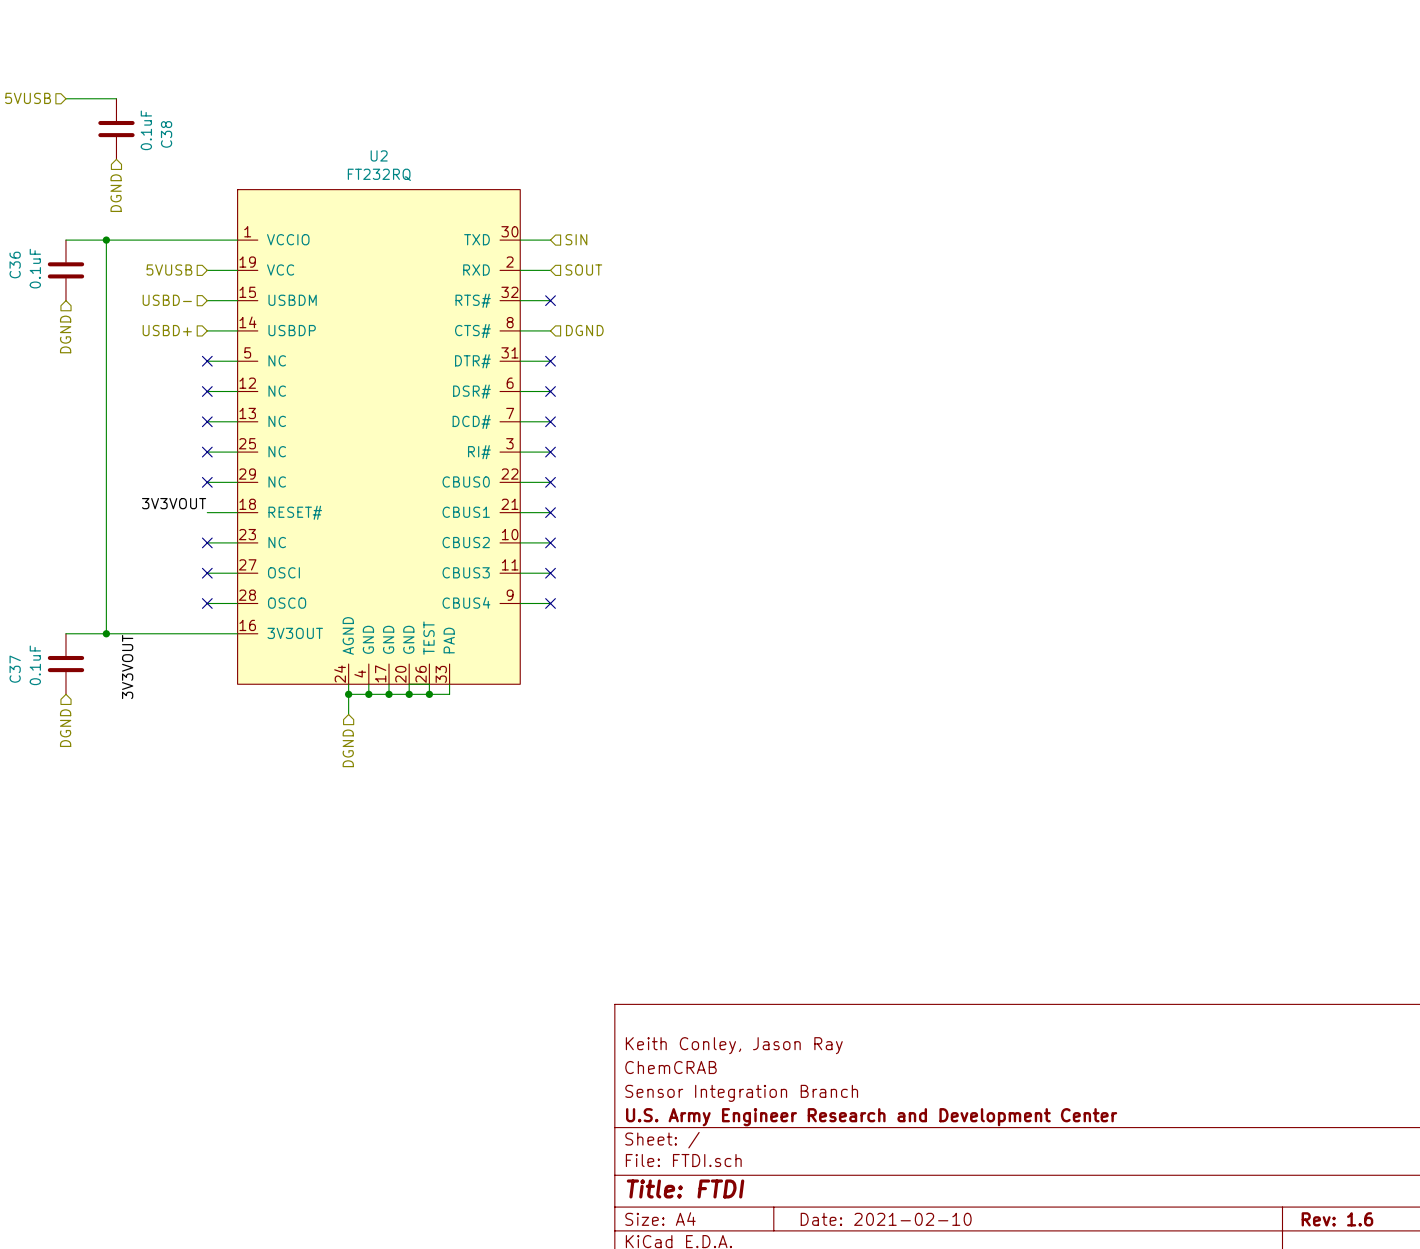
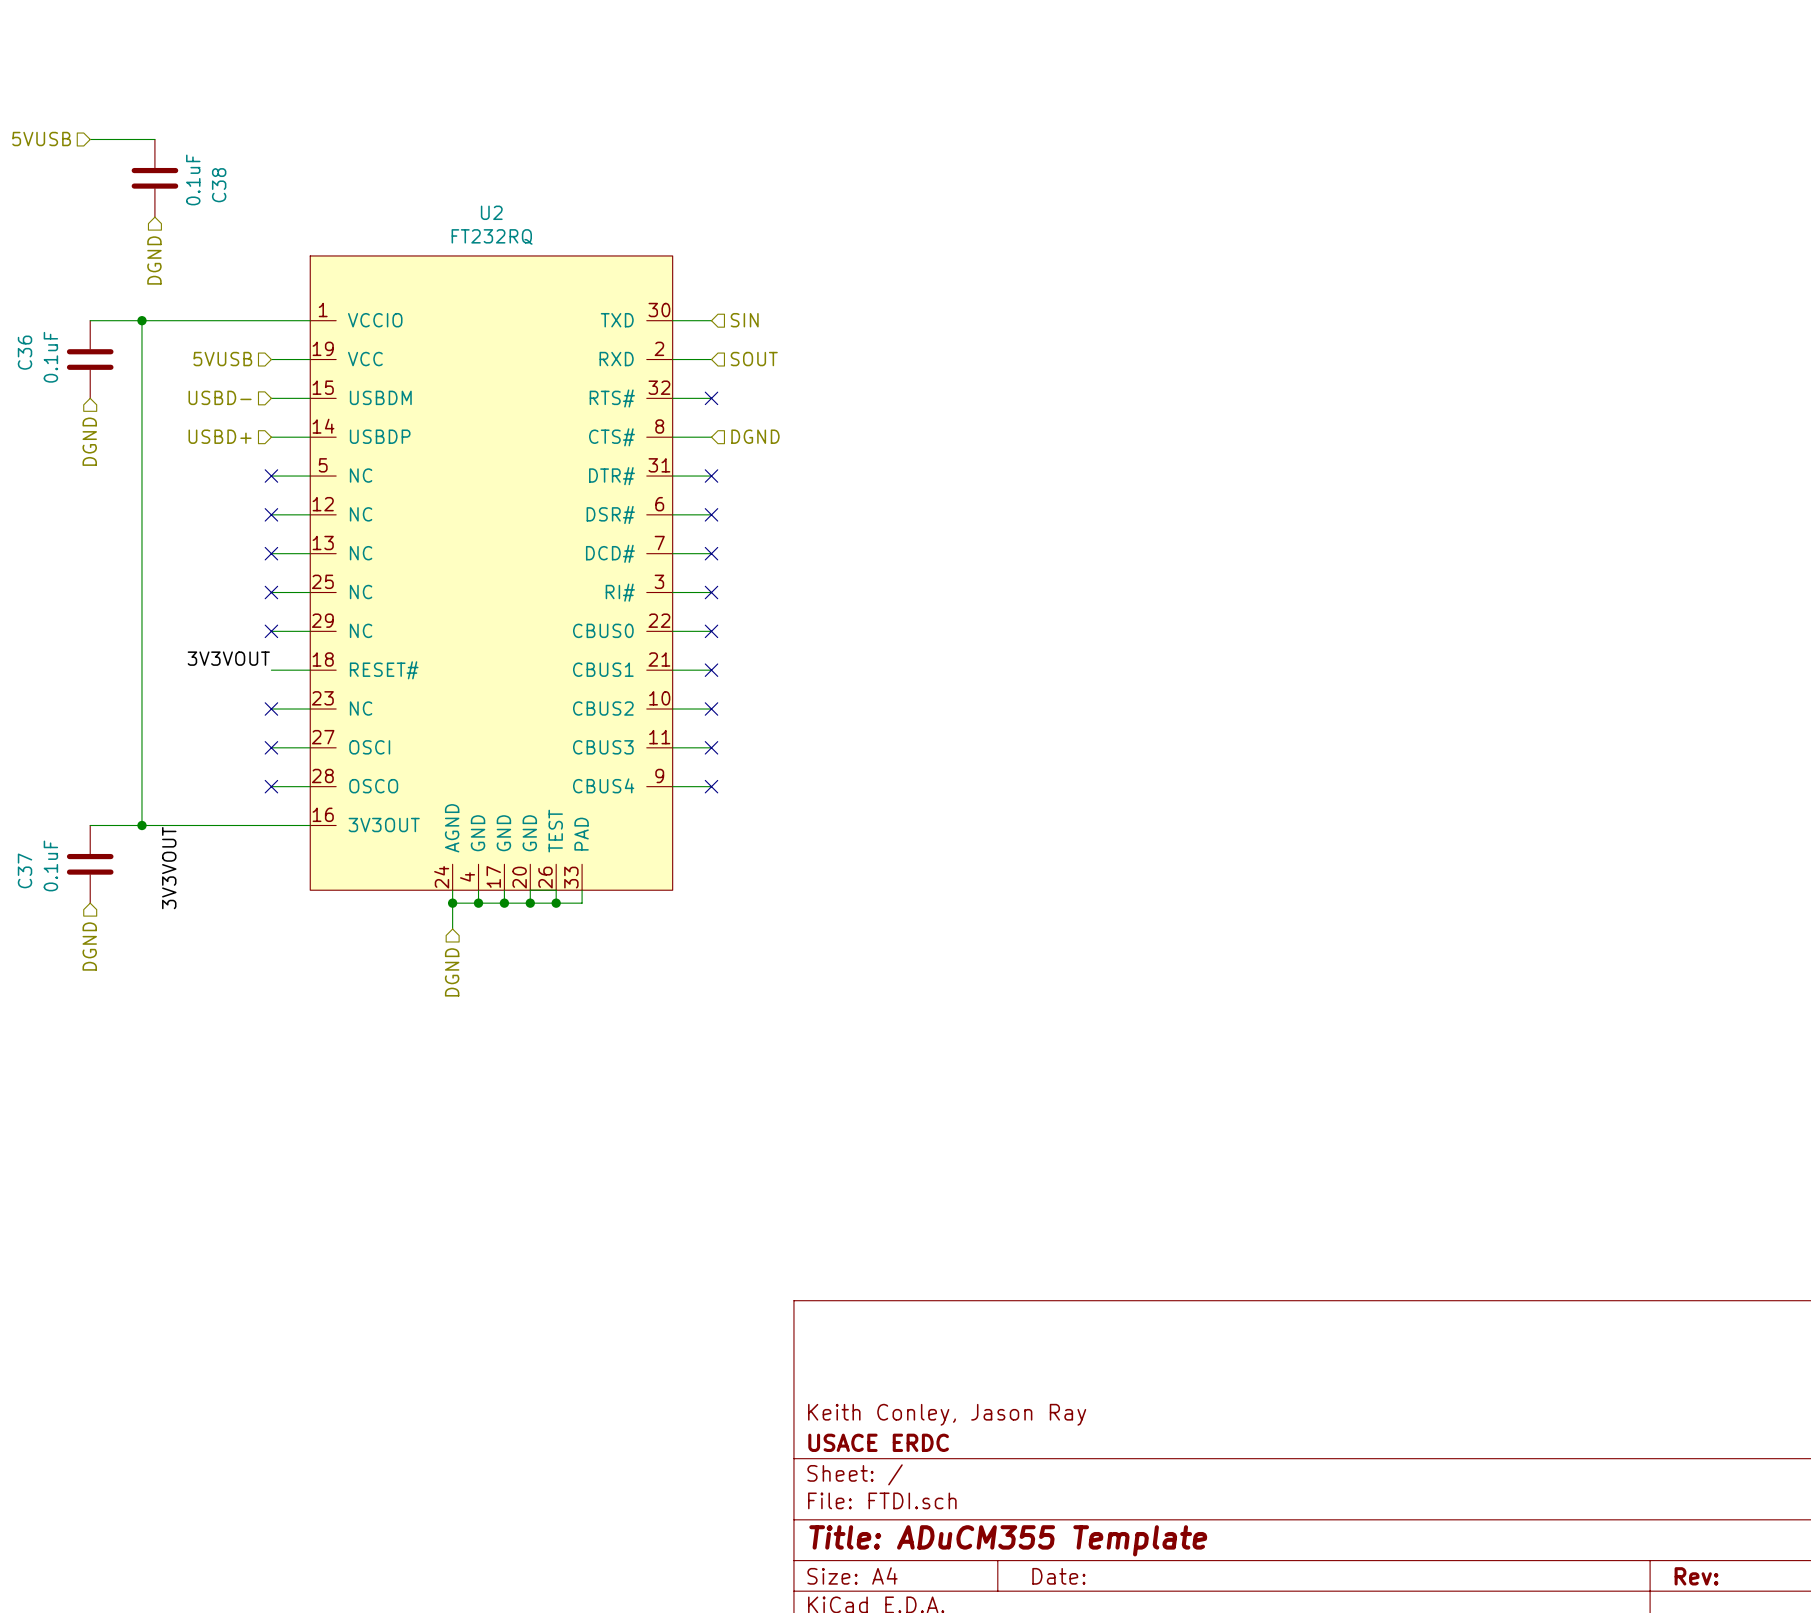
title block: Keith Conley, Jason Ray (734, 1045) -> none
title block: ChemCRAB (670, 1067) -> none
title block: Sensor Integration Branch (741, 1093) -> Keith Conley, Jason Ray (947, 1414)
title block: U.S. Army Engineer Research and Development Center (871, 1117) -> USACE ERDC (878, 1442)
title block: Title: FTDI (685, 1188) -> Title: ADuCM355 Template (1008, 1540)
title block: Date: 2021-02-10 (886, 1219) -> Date: (1058, 1576)
title block: Rev: 1.6 (1337, 1219) -> Rev: (1696, 1576)

